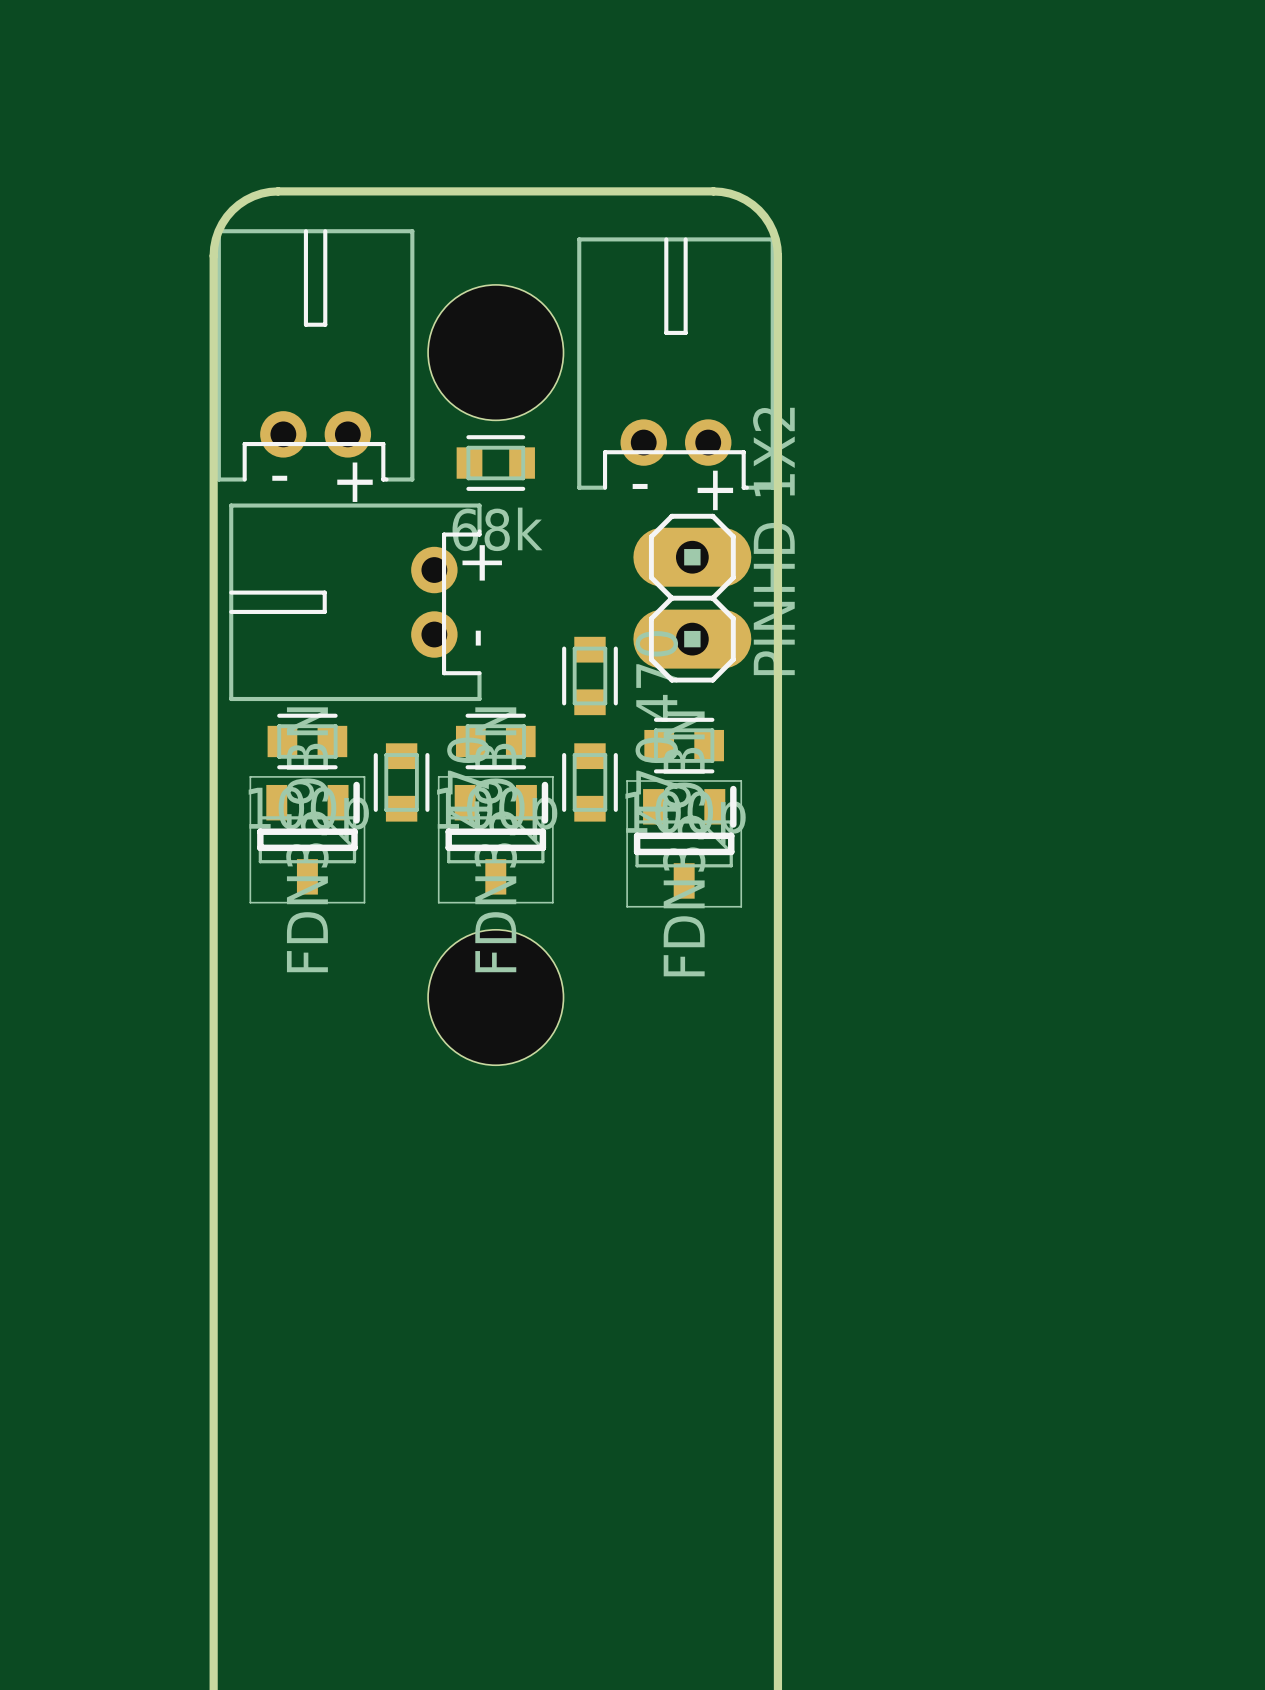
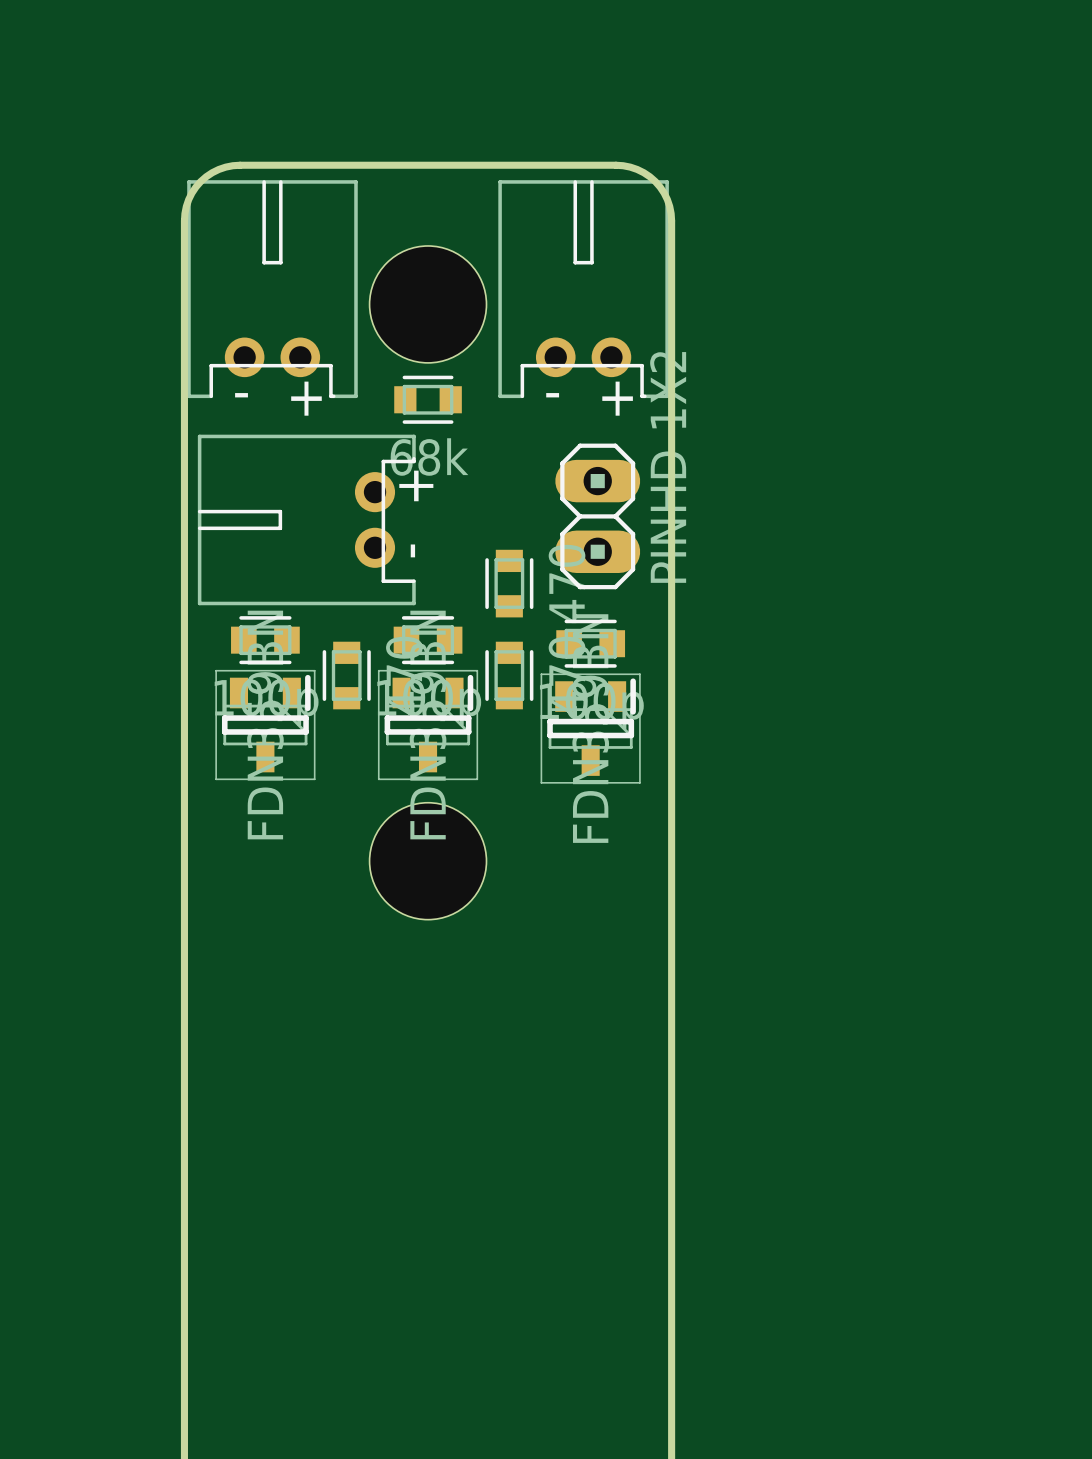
part footprint: [216, 229, 415, 482] -> [187, 180, 358, 399]
part footprint: [577, 237, 775, 490] -> [498, 180, 669, 399]
part footprint: [633, 513, 752, 683] -> [555, 443, 641, 590]

